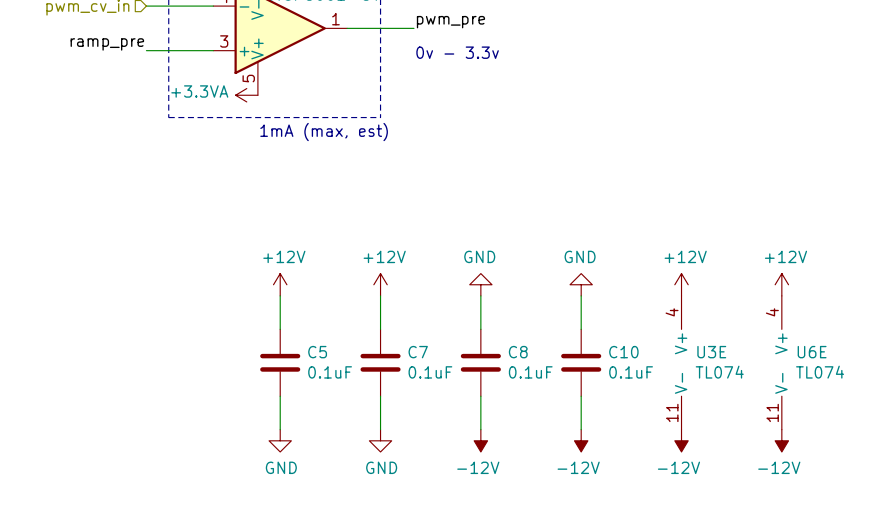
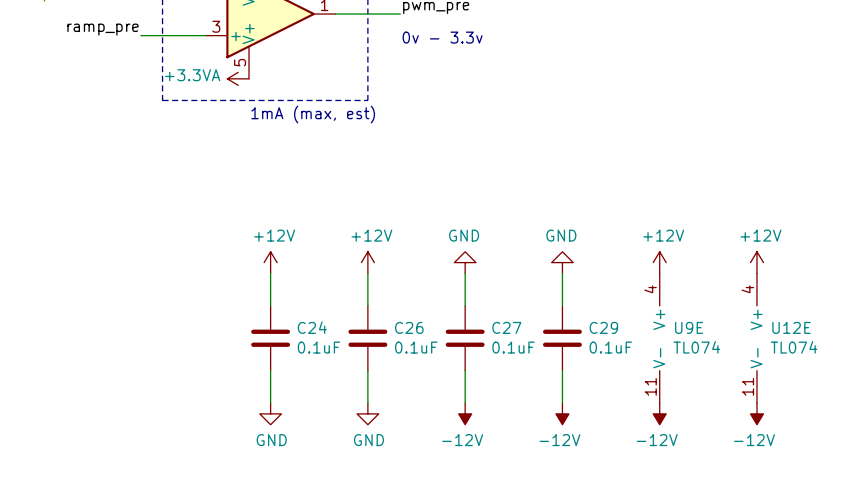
C5 name: C5 (317, 352) -> C24 (312, 327)
C7 name: C7 (418, 352) -> C26 (409, 327)
C8 name: C8 (518, 352) -> C27 (506, 327)
C10 name: C10 (623, 352) -> C29 (603, 327)
U3E name: U3E (711, 352) -> U9E (689, 327)
U6E name: U6E (812, 352) -> U12E (791, 327)

